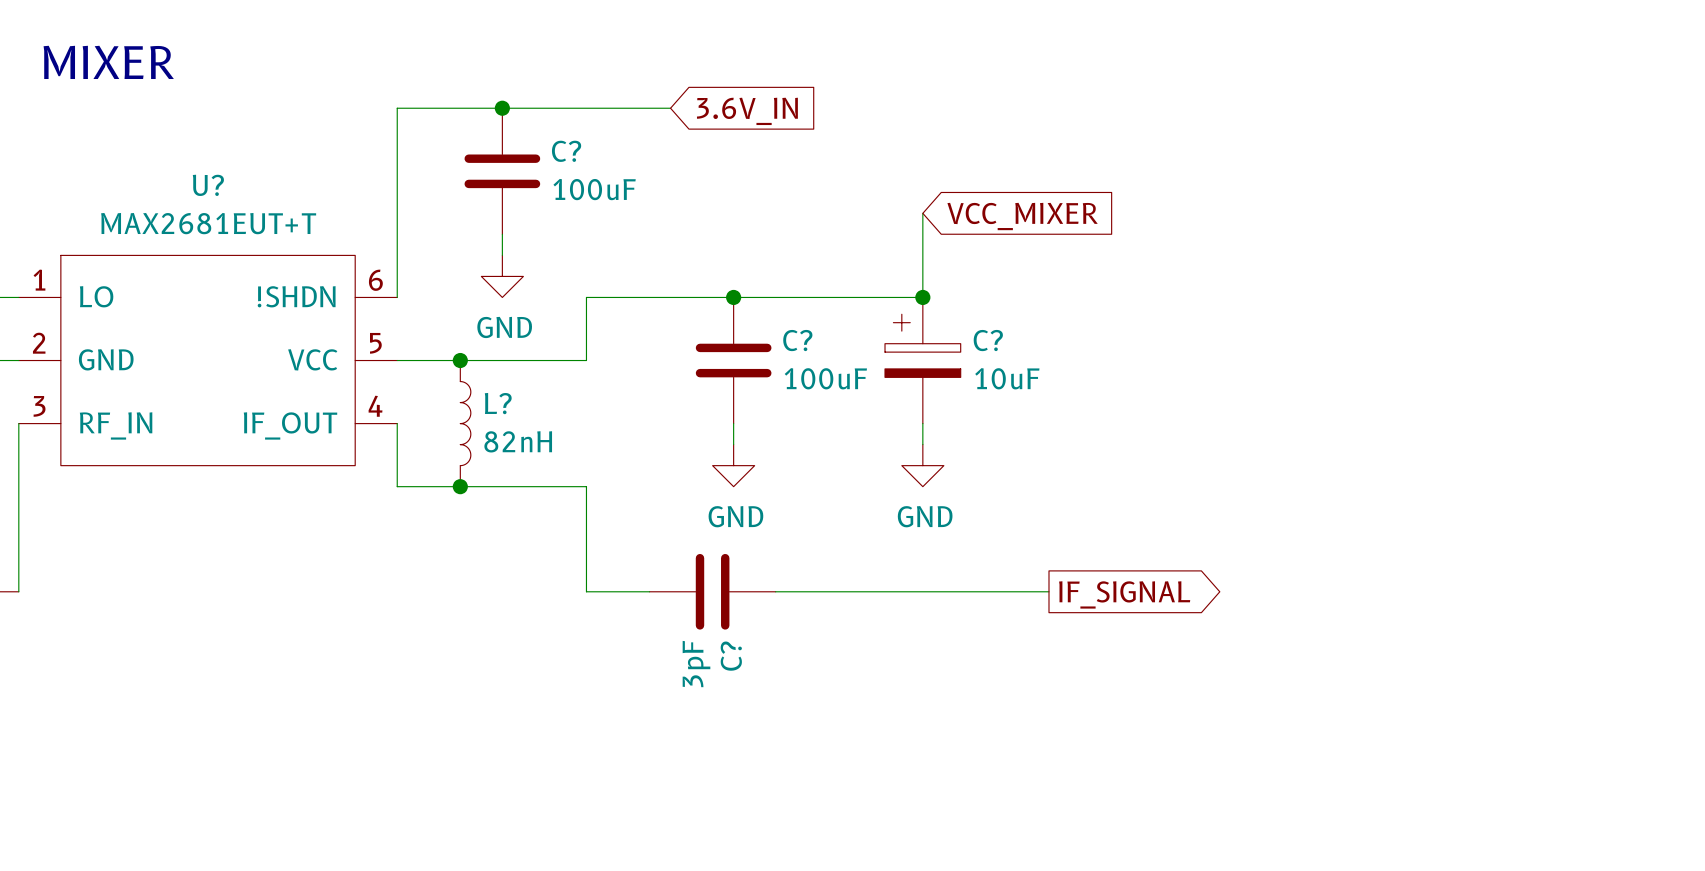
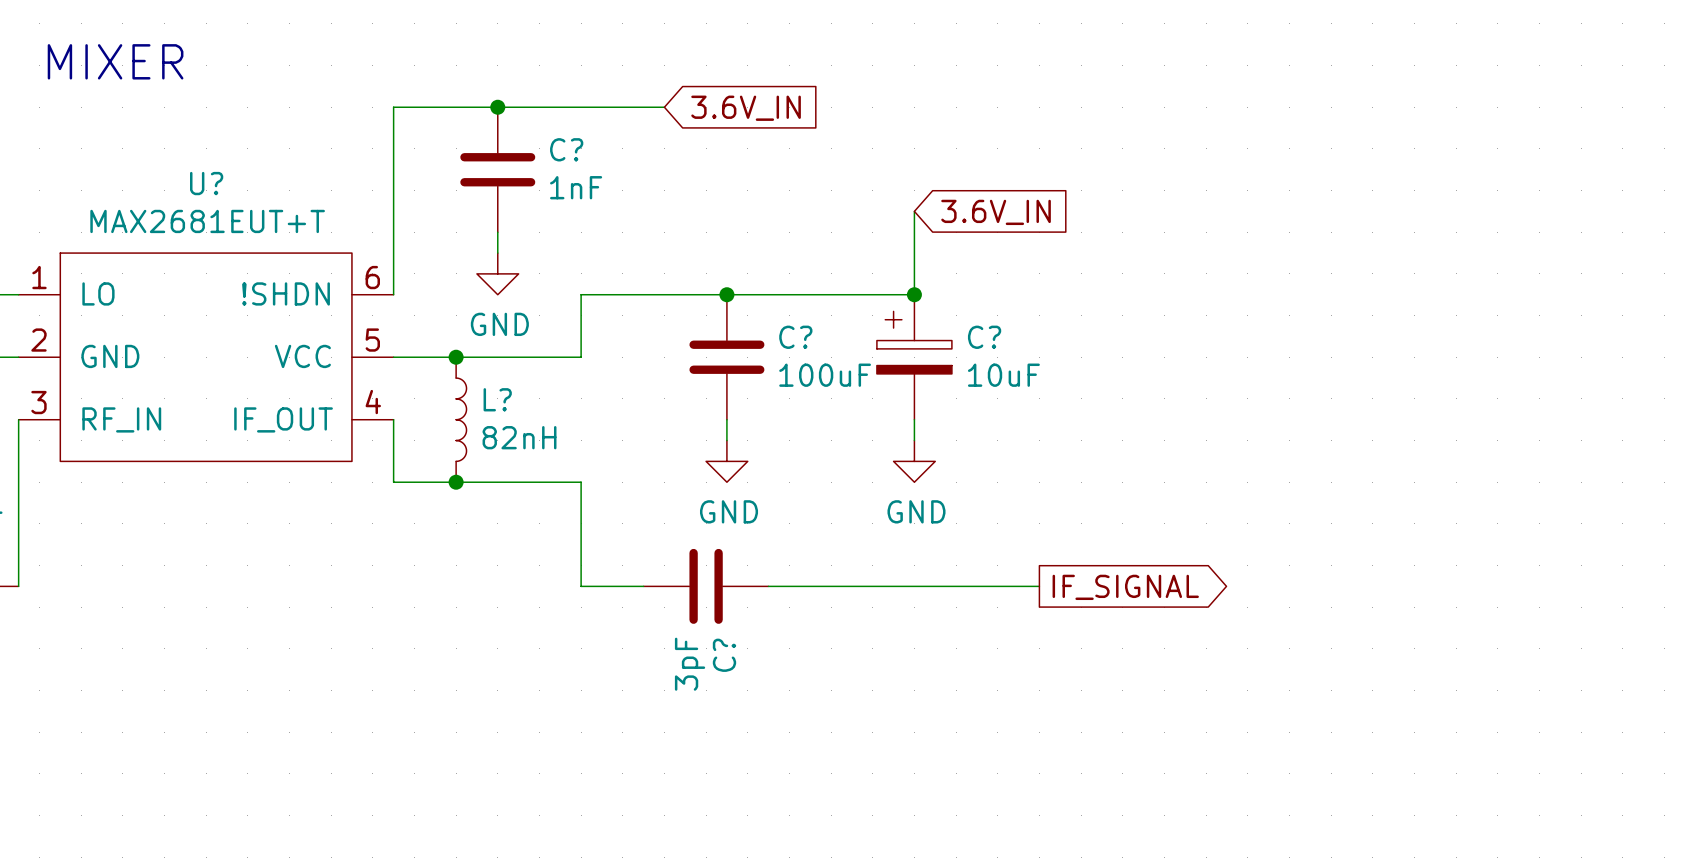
C? value: 100uF (594, 189) -> 1nF (576, 187)
global label: VCC_MIXER (1022, 216) -> 3.6V_IN (996, 212)

